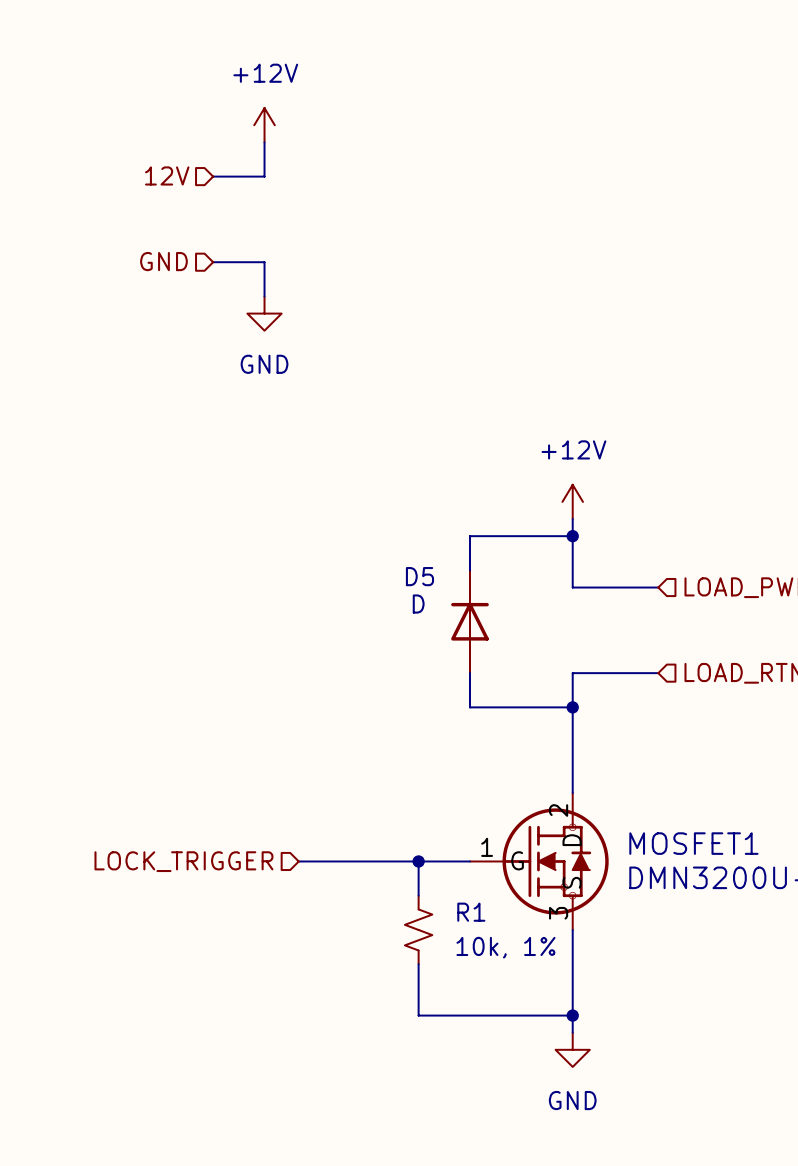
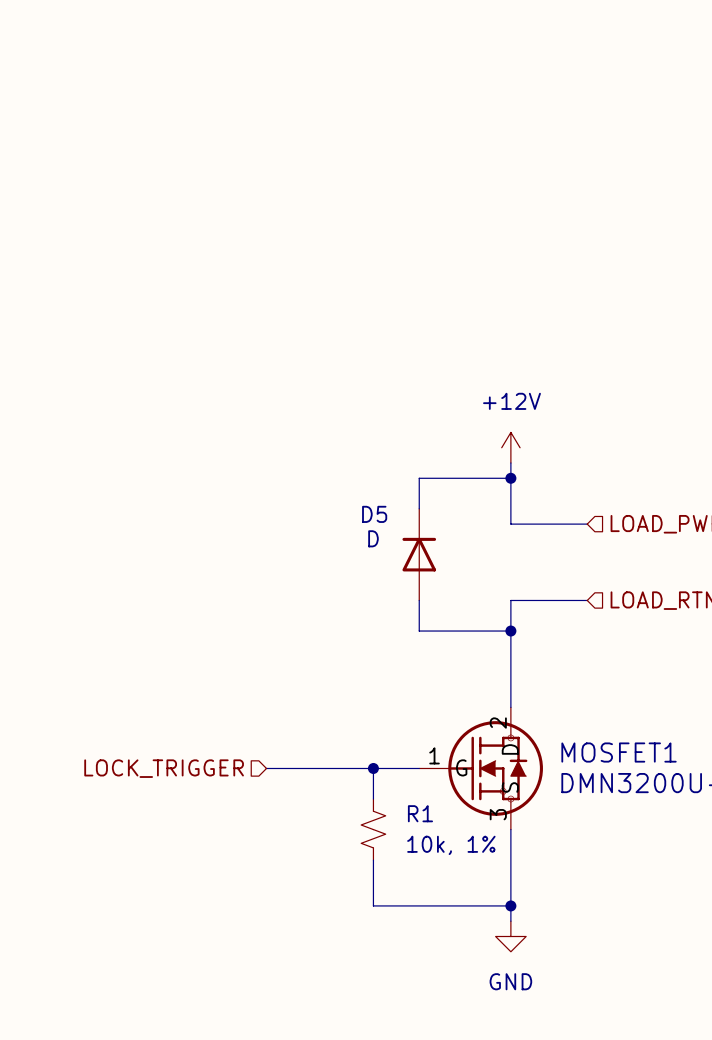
power symbol: +12V (264, 125) -> none
wire: (264, 142) (264, 176) (213, 176) -> none
hierarchical label: 12V (167, 175) -> none
hierarchical label: GND (163, 261) -> none
wire: (213, 262) (264, 262) (264, 296) -> none
power symbol: GND (264, 313) -> none

